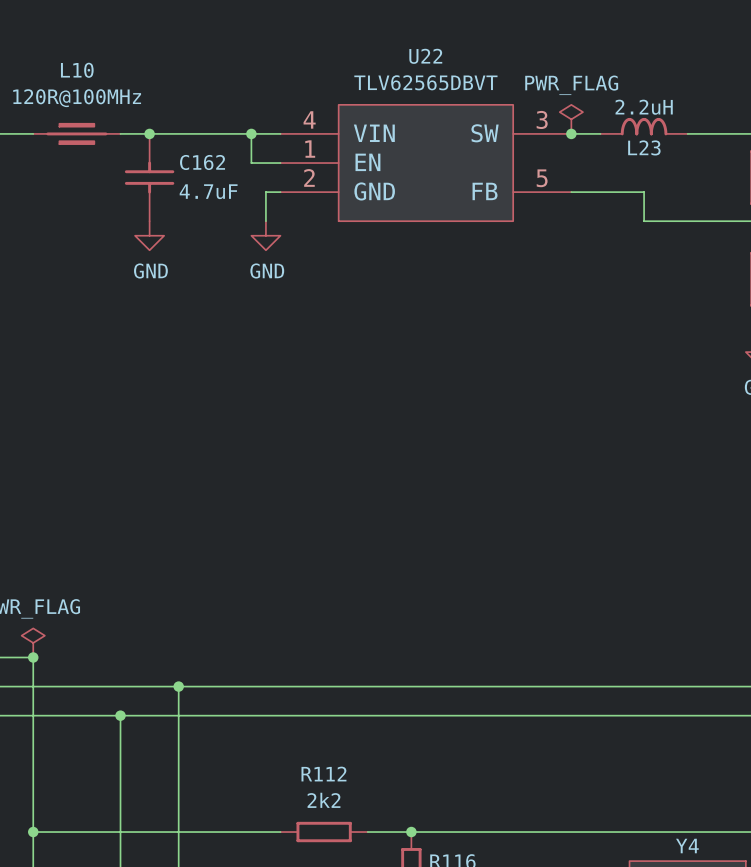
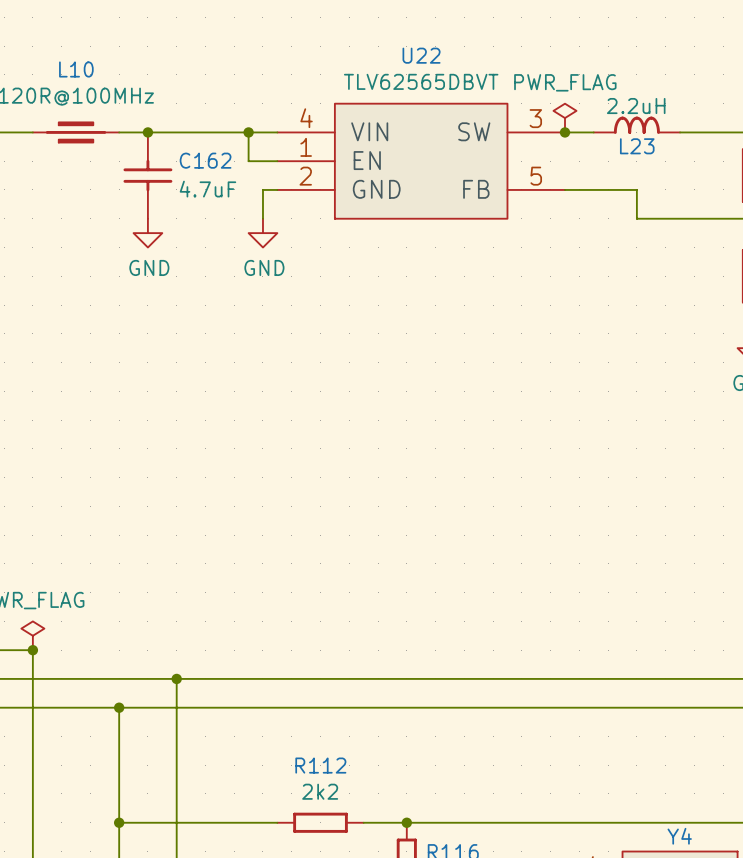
wire: (33, 832) (120, 832) -> none
junction: (33, 832) -> none
junction: none -> (119, 822)

